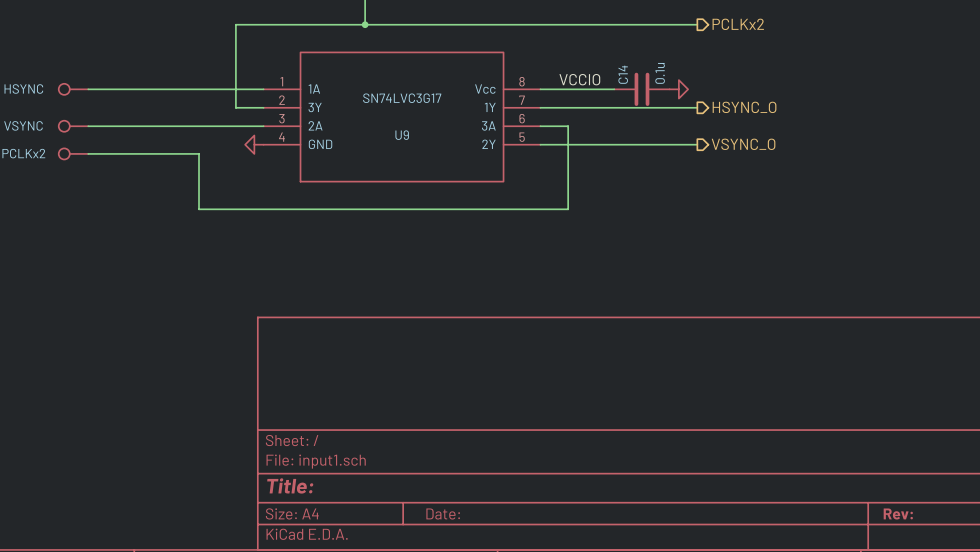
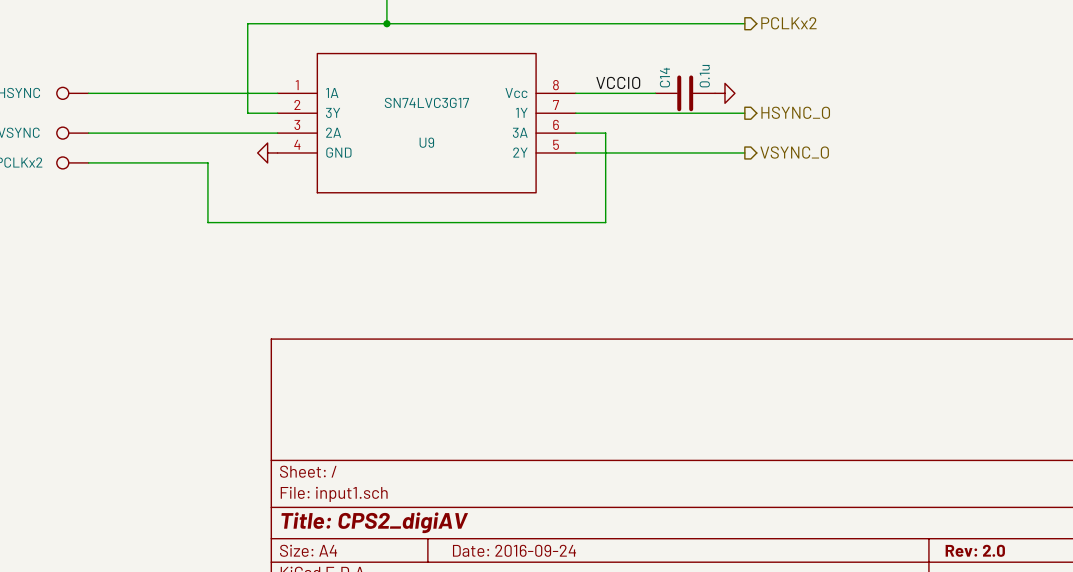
title block: Title: (290, 485) -> Title: CPS2_digiAV (374, 522)
title block: Rev: (898, 513) -> Rev: 2.0 (975, 550)
title block: Date: (443, 514) -> Date: 2016-09-24 (514, 550)

